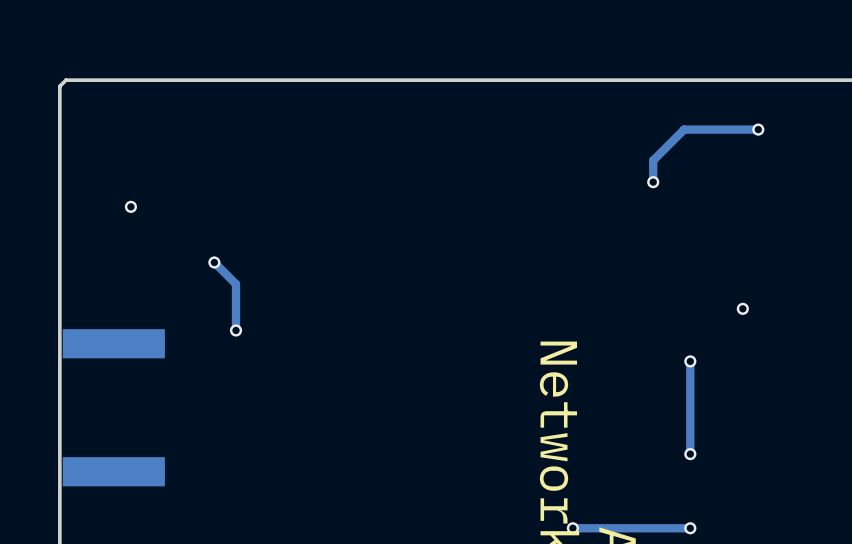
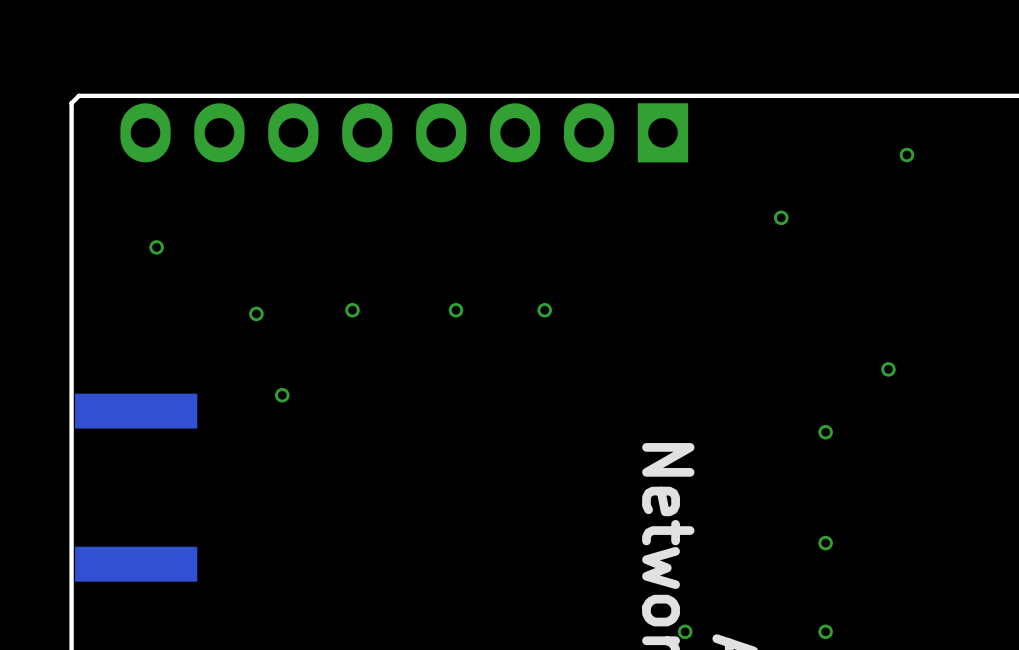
part: none -> (404, 132)
track: (758, 129) (684, 129) (653, 160) (653, 182) -> none
via: none -> (352, 310)
via: none -> (456, 310)
via: none -> (544, 310)
track: (214, 262) (236, 284) (236, 330) -> none
track: (690, 361) (690, 454) -> none
track: (690, 528) (572, 528) -> none

